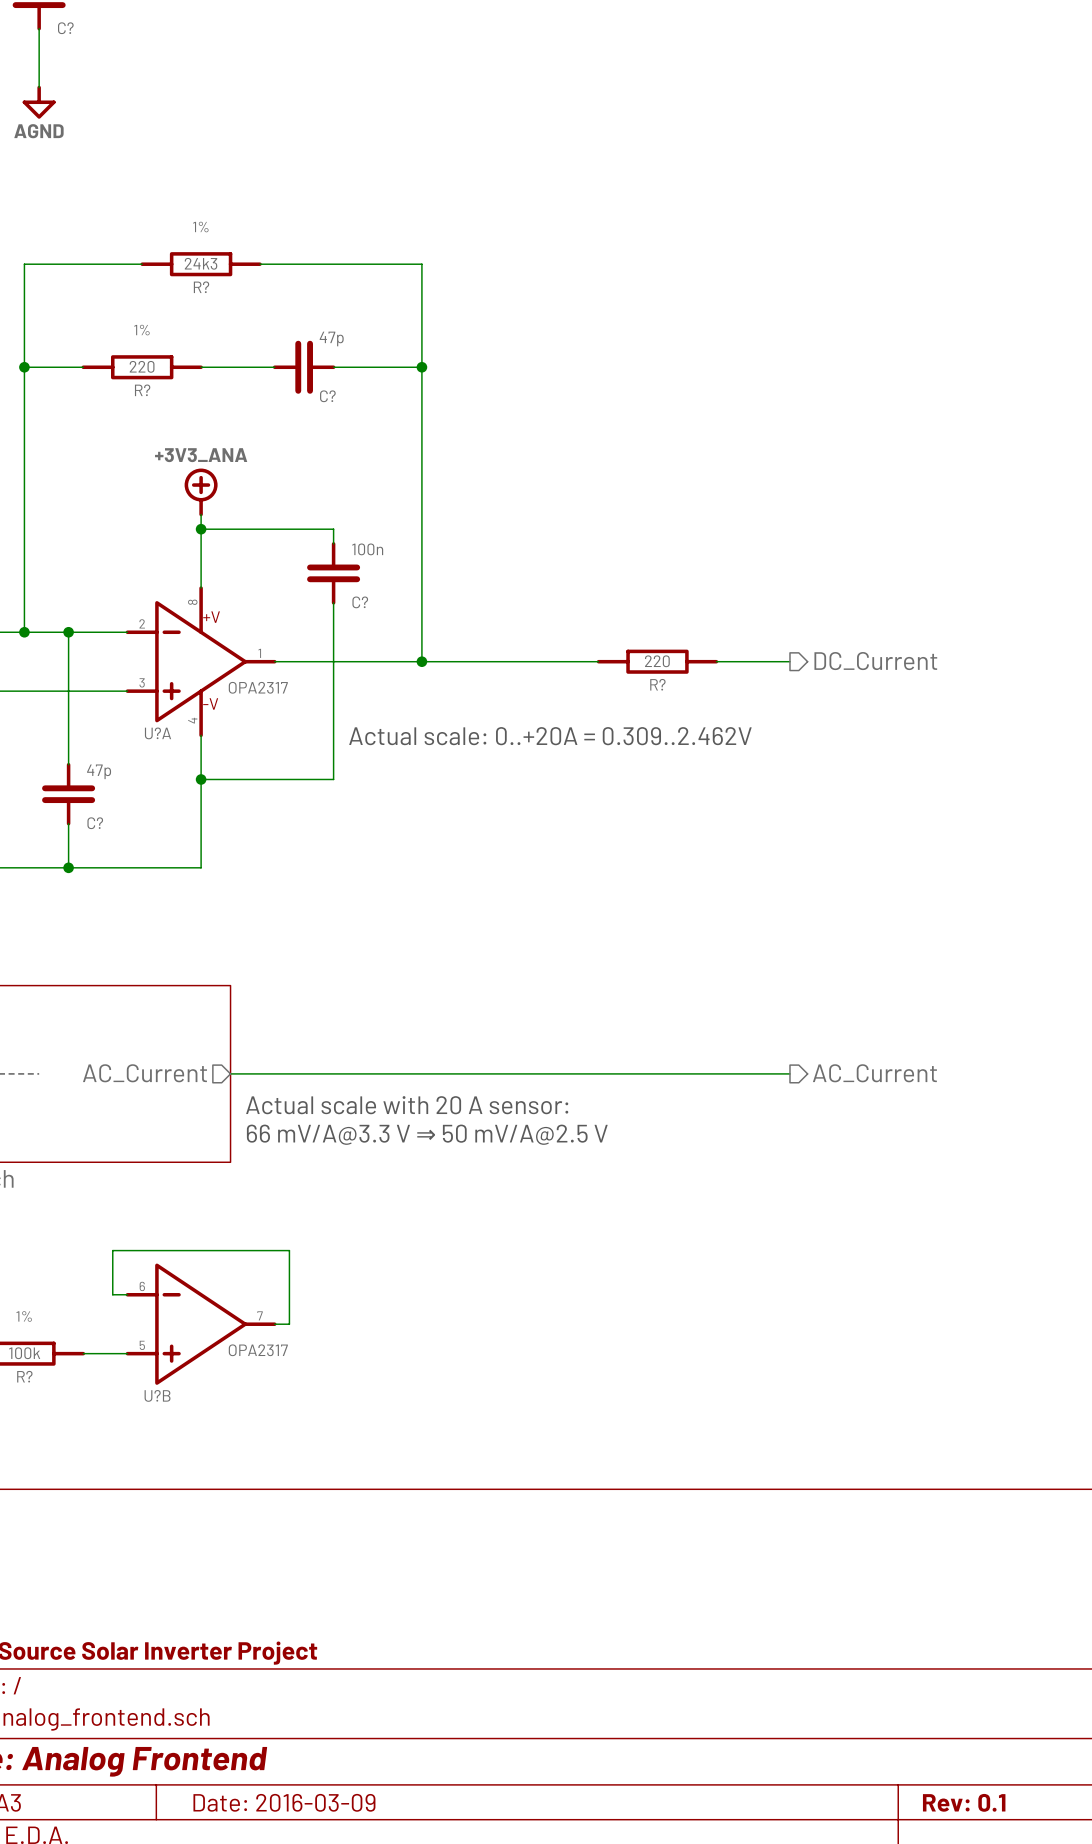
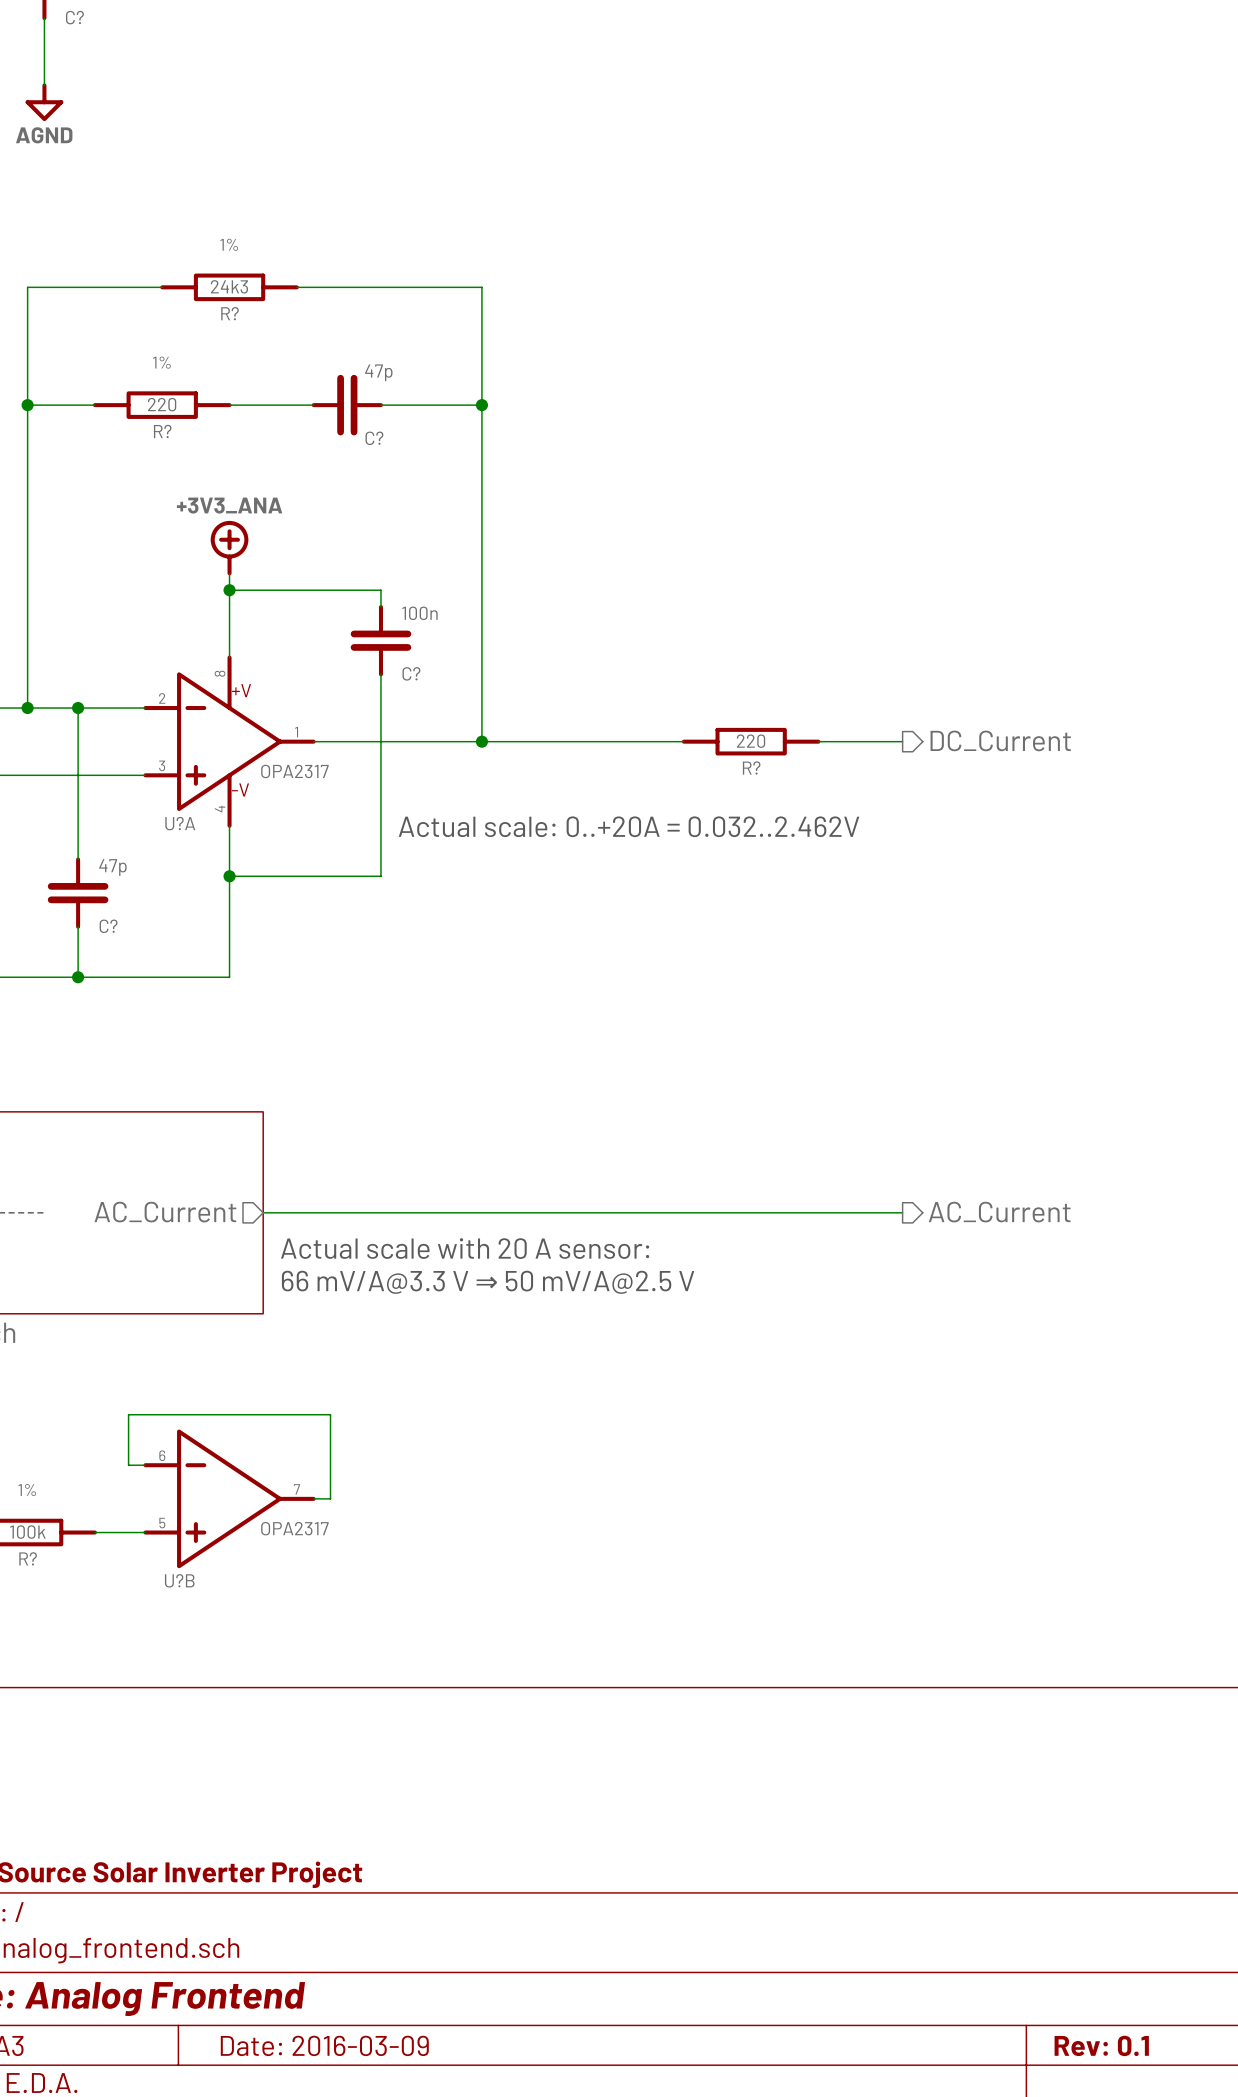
text: Actual scale: 0..+20A = 0.309..2.462V (550, 736) -> Actual scale: 0..+20A = 0.032..2.462V (629, 826)

